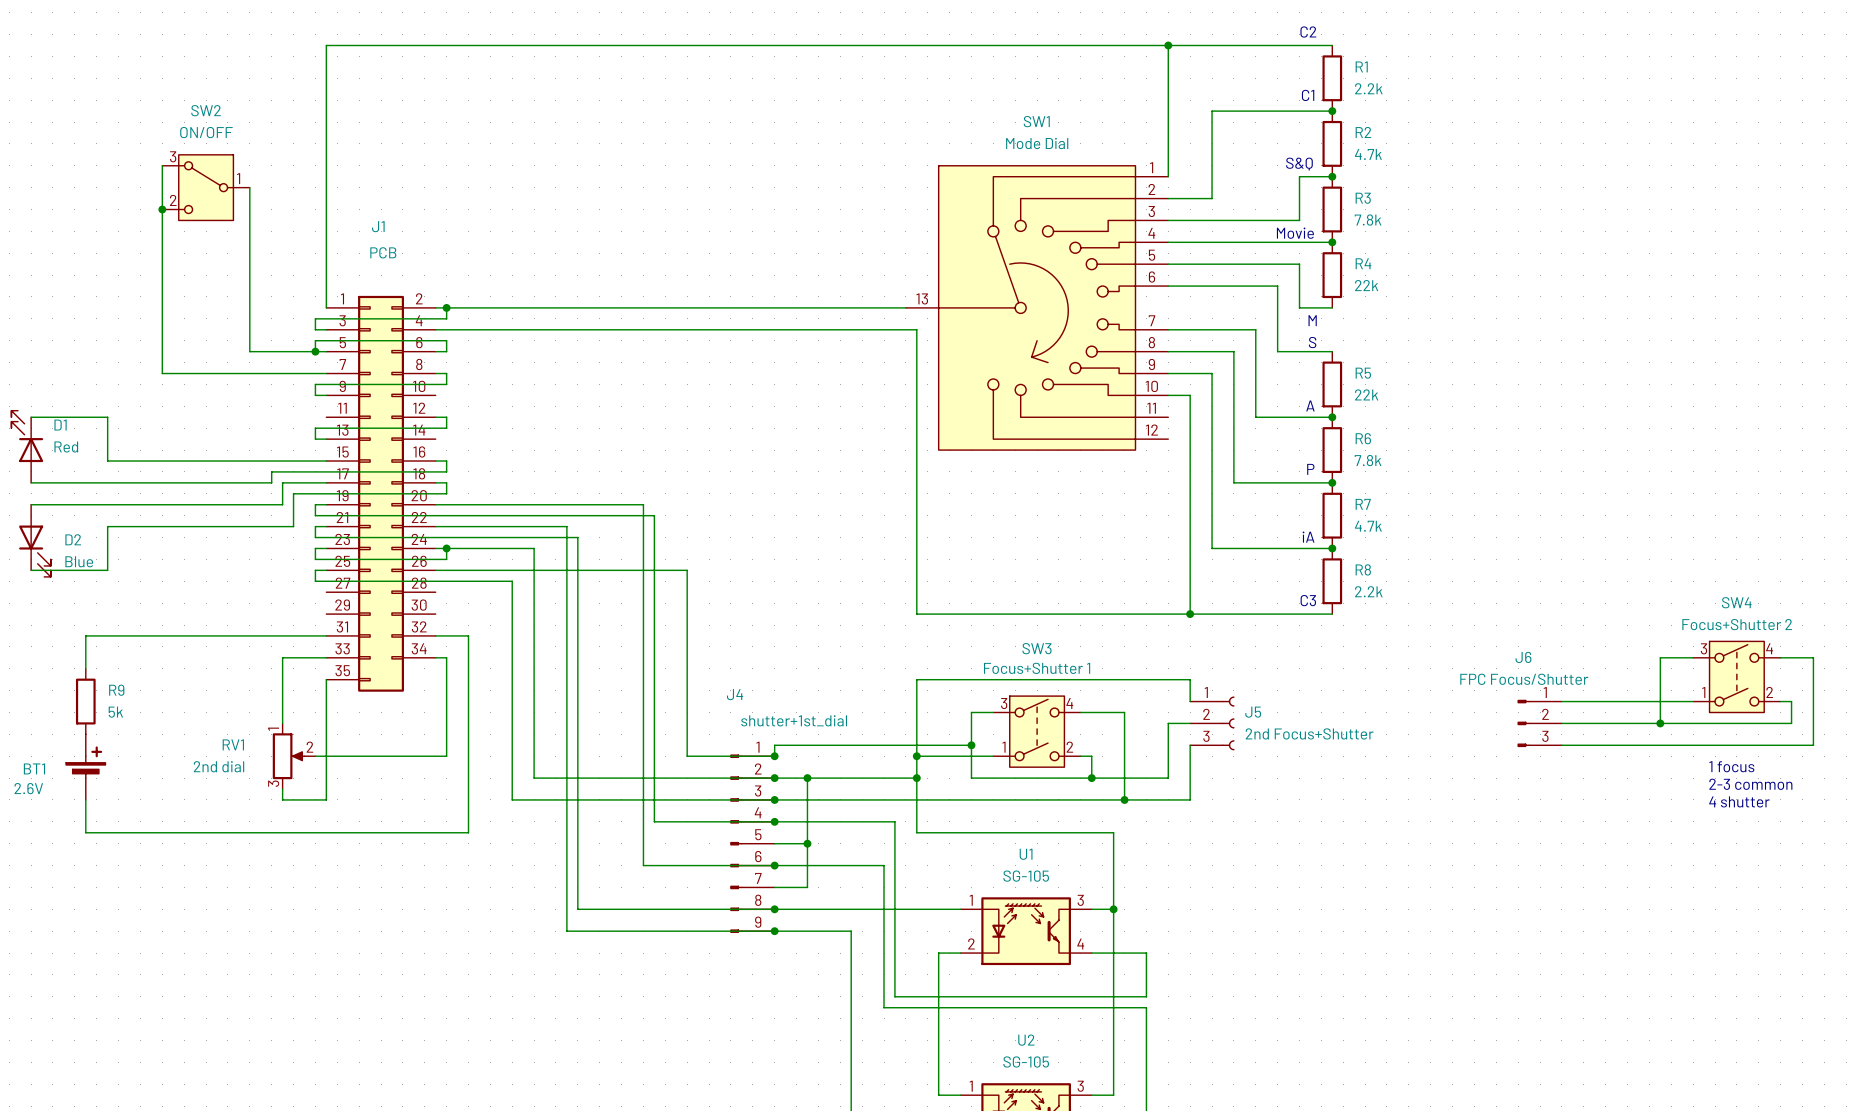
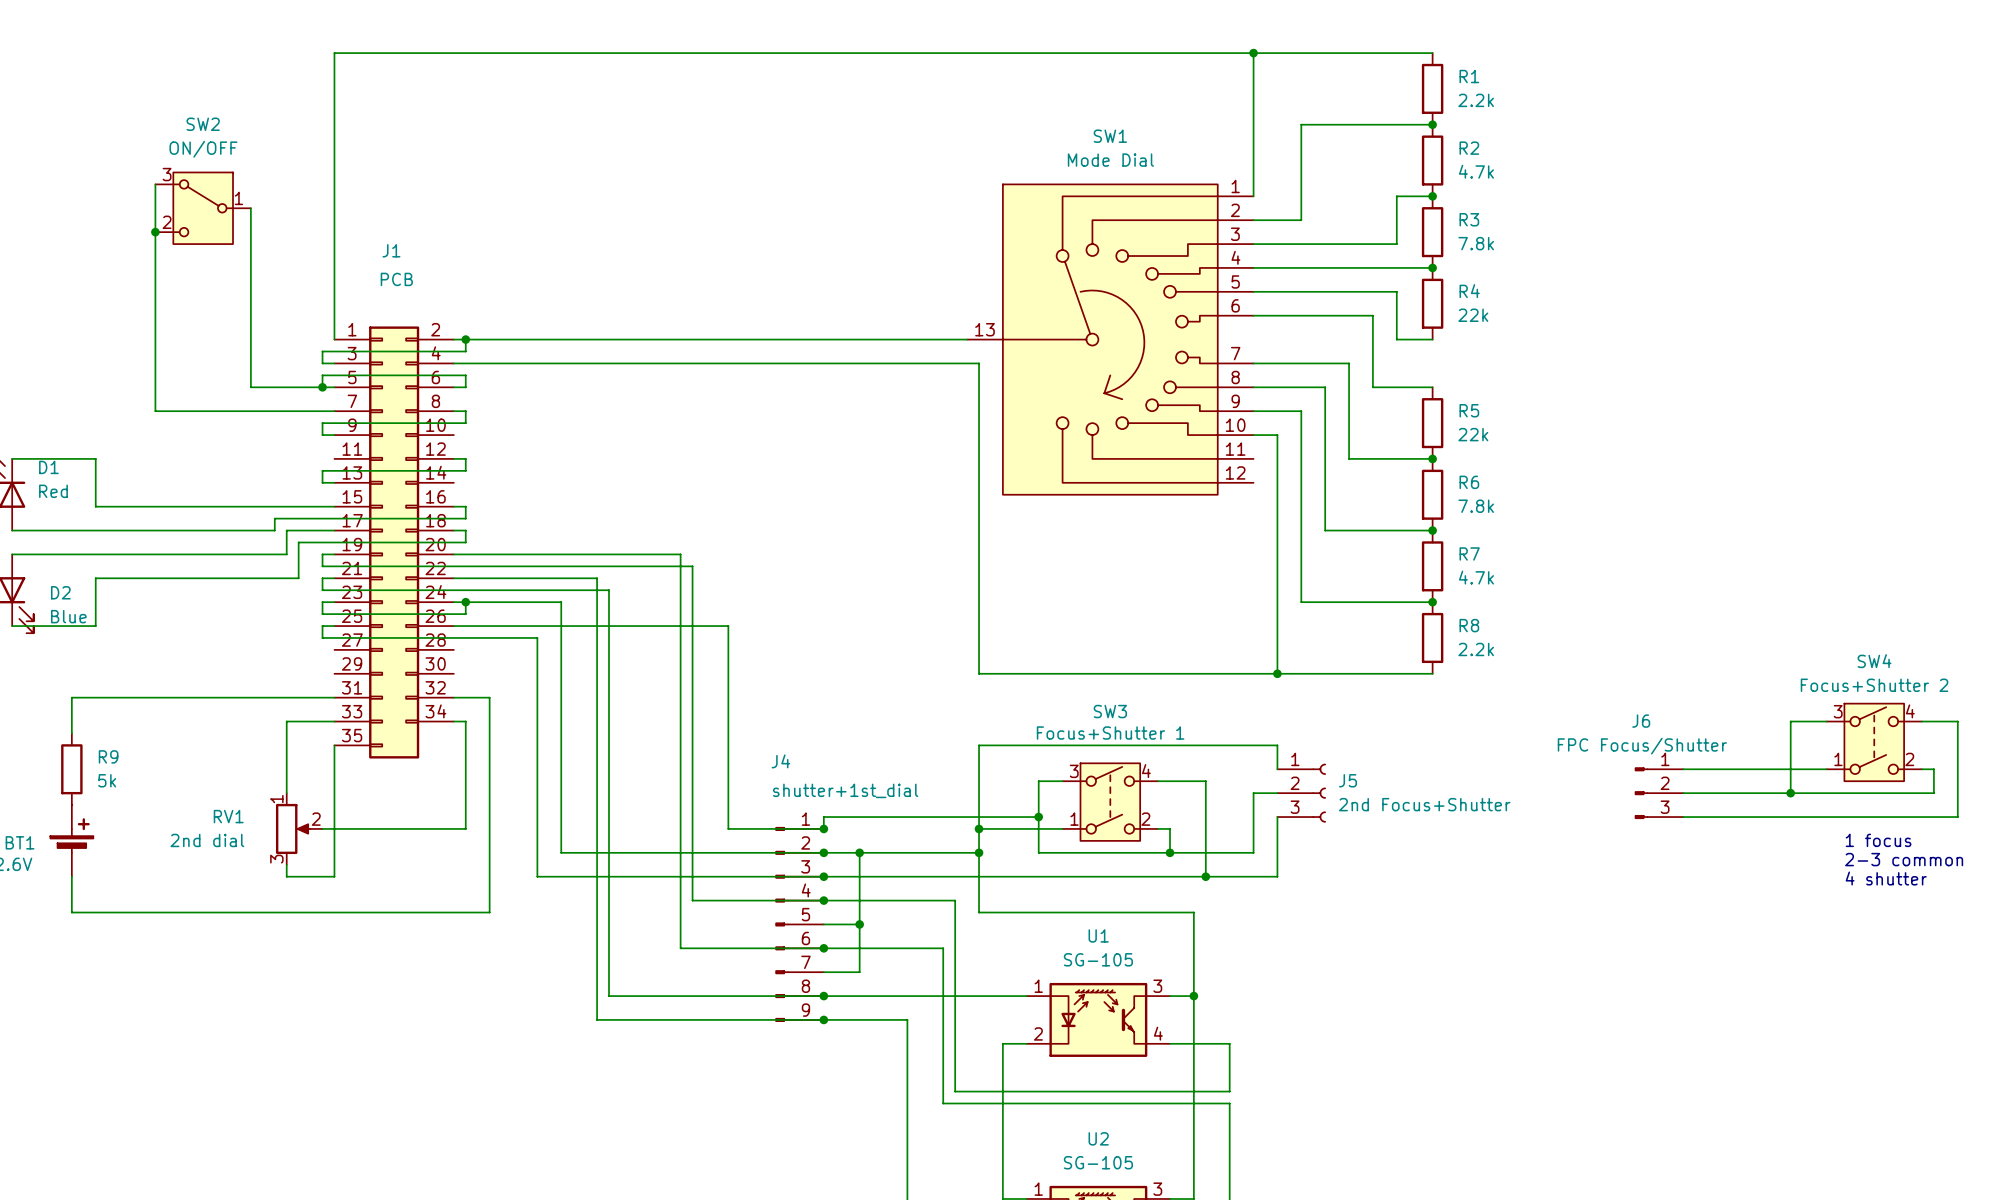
text: C2 (1308, 32) -> none
text: C1 (1308, 95) -> none
text: S&Q (1299, 164) -> none
text: Movie (1295, 233) -> none
text: M (1312, 320) -> none
text: S (1312, 342) -> none
text: A (1310, 405) -> none
text: P (1310, 469) -> none
text: iA (1308, 537) -> none
text: C3 (1308, 600) -> none

